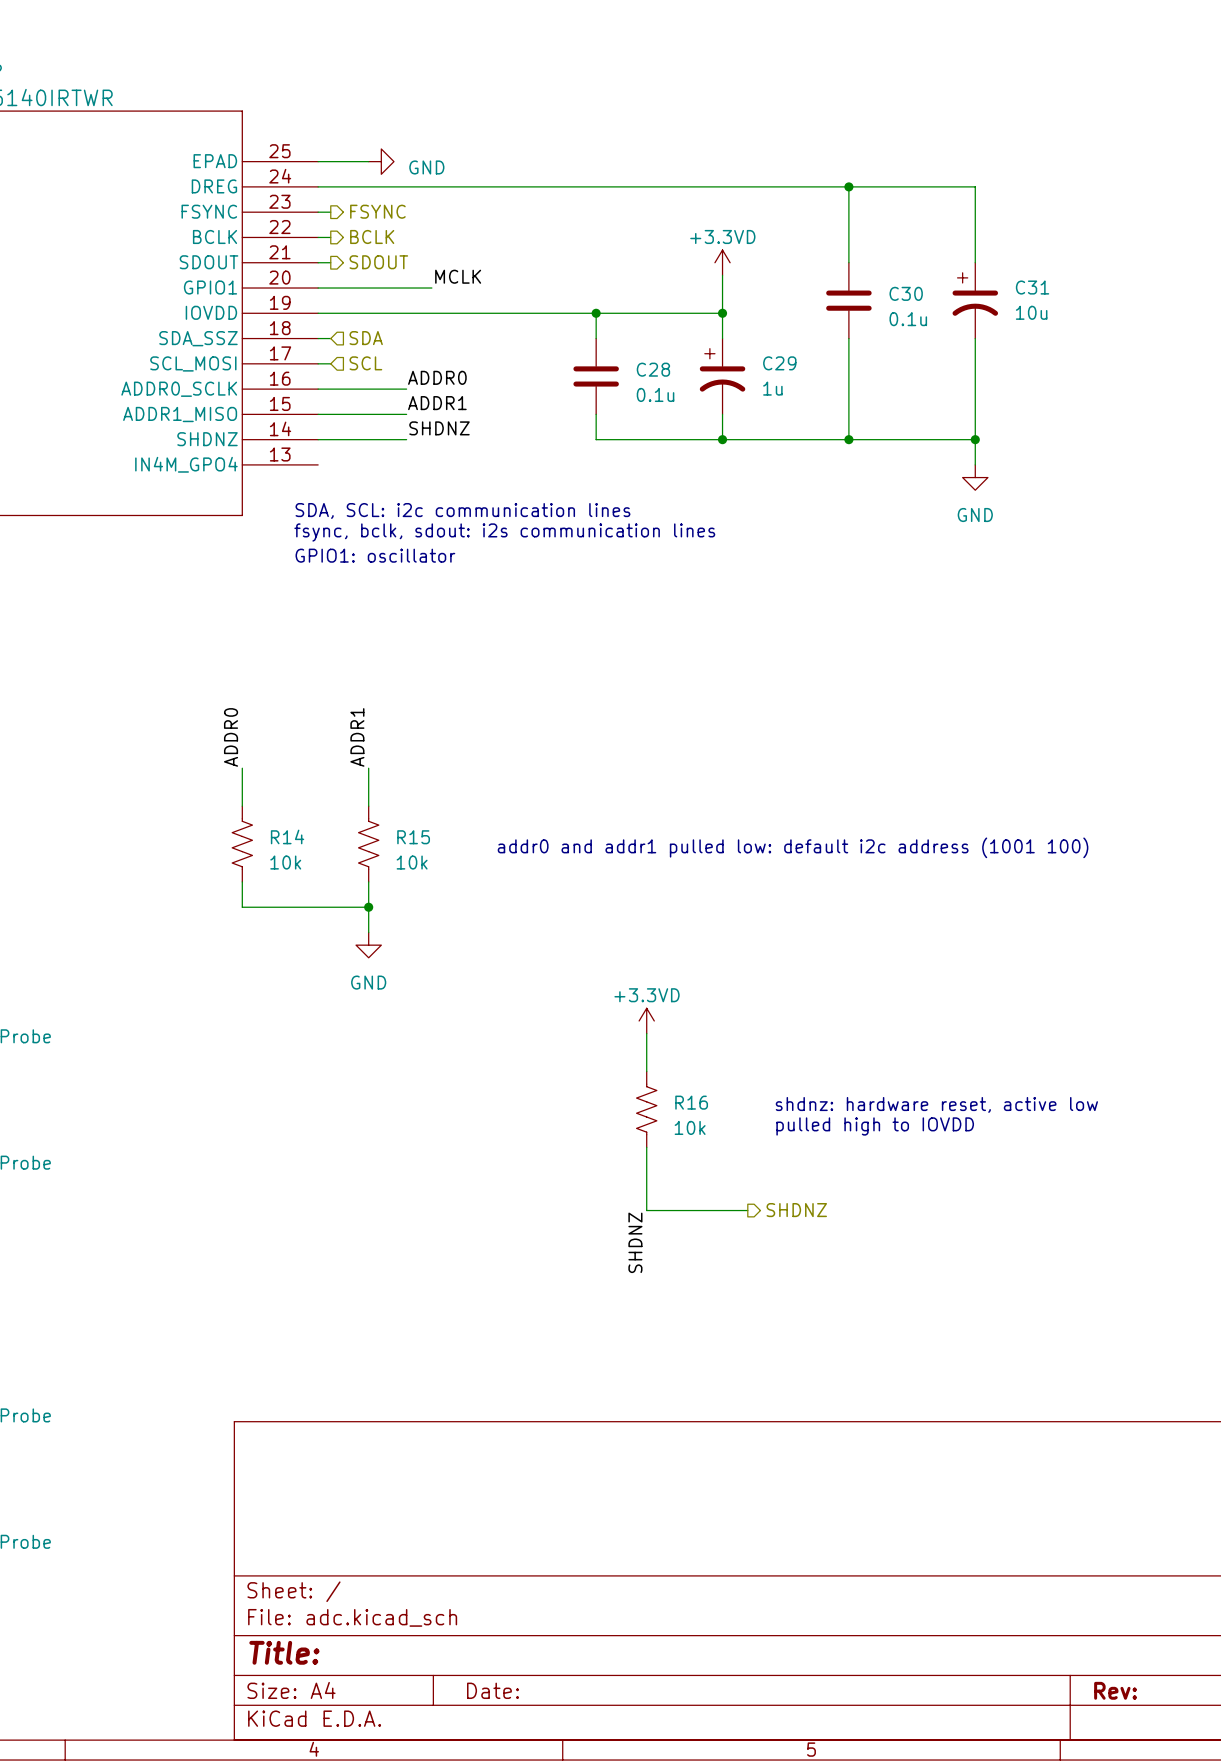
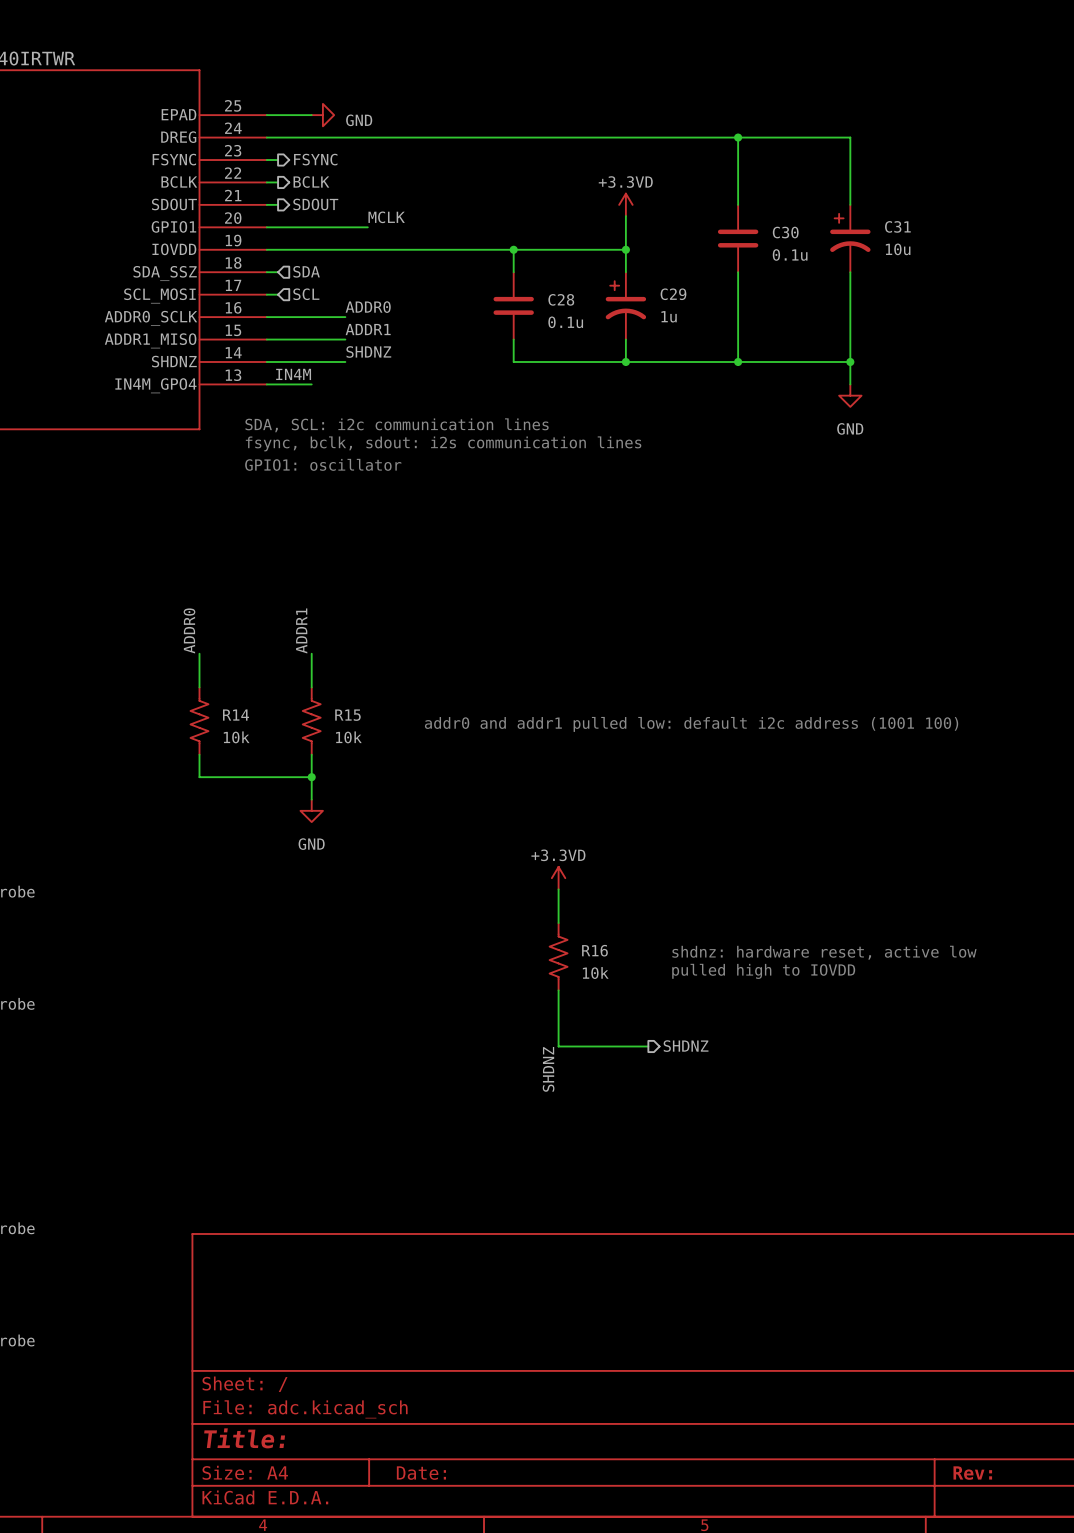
label: none -> IN4M (293, 374)
wire: none -> (266, 384) (311, 384)

